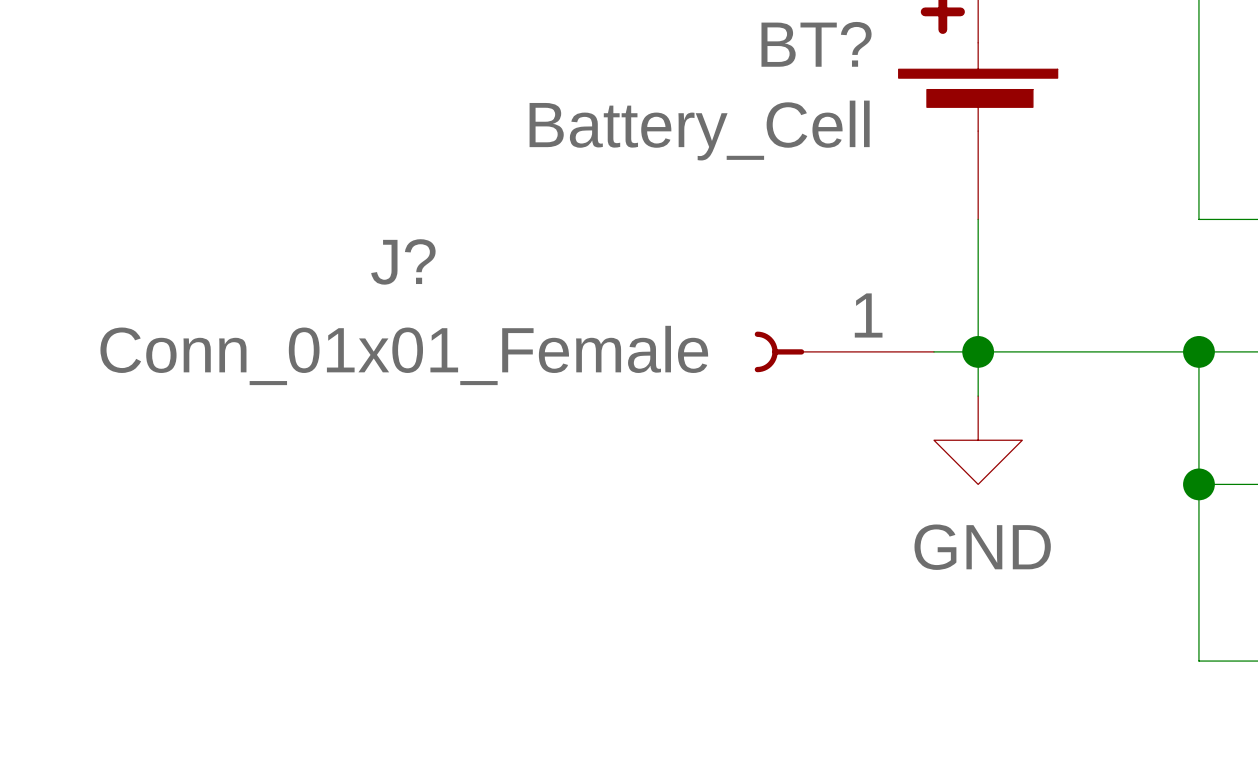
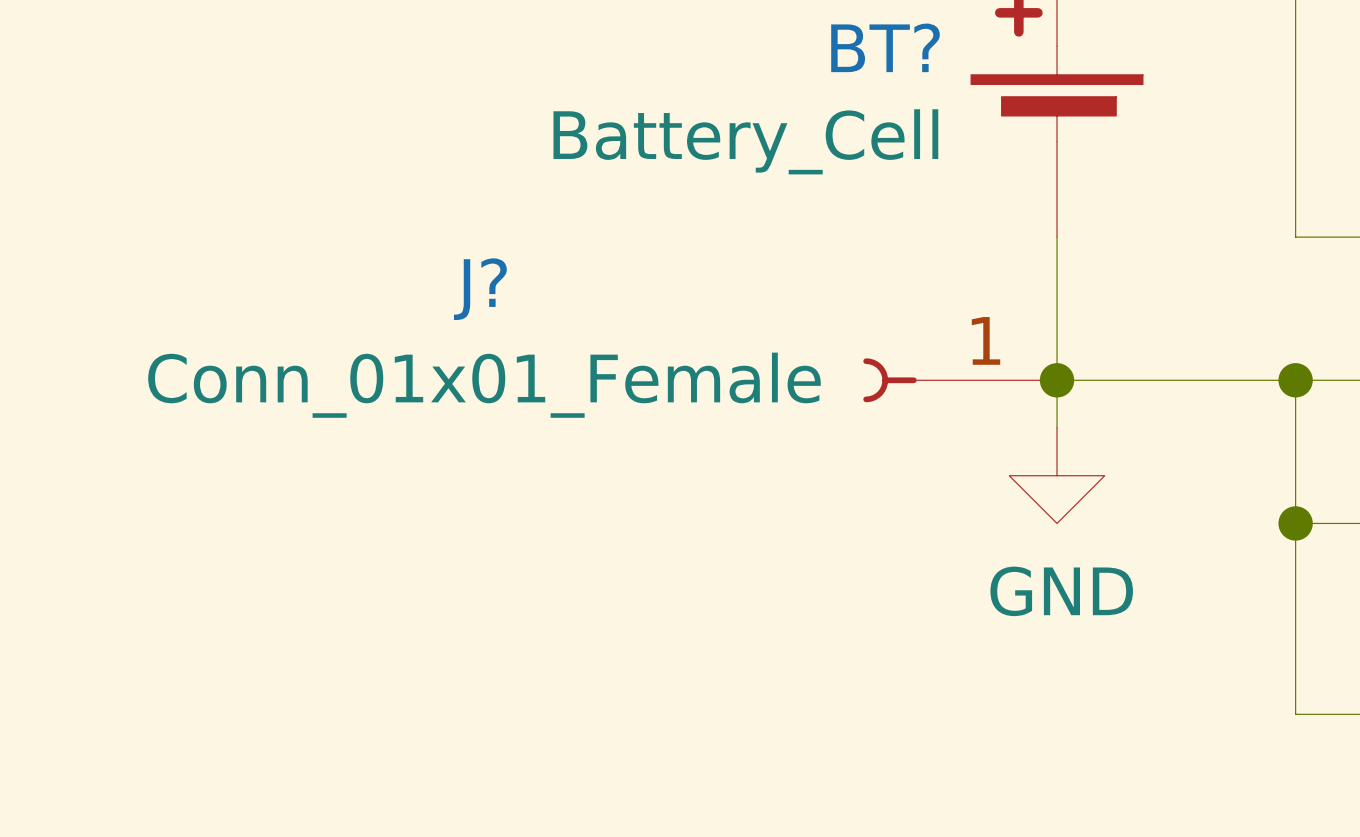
J? position: (844, 351) -> (960, 380)

